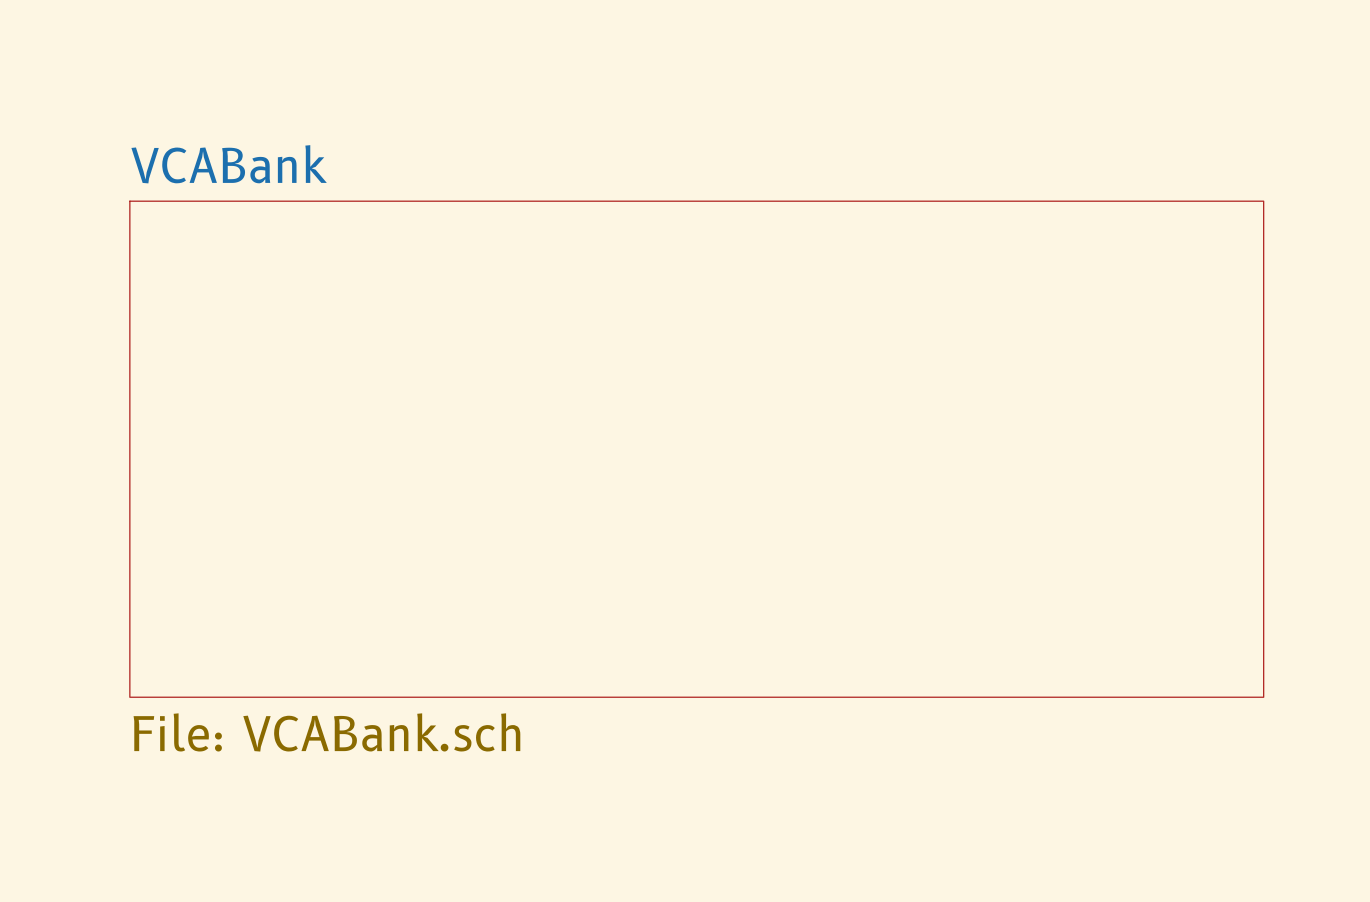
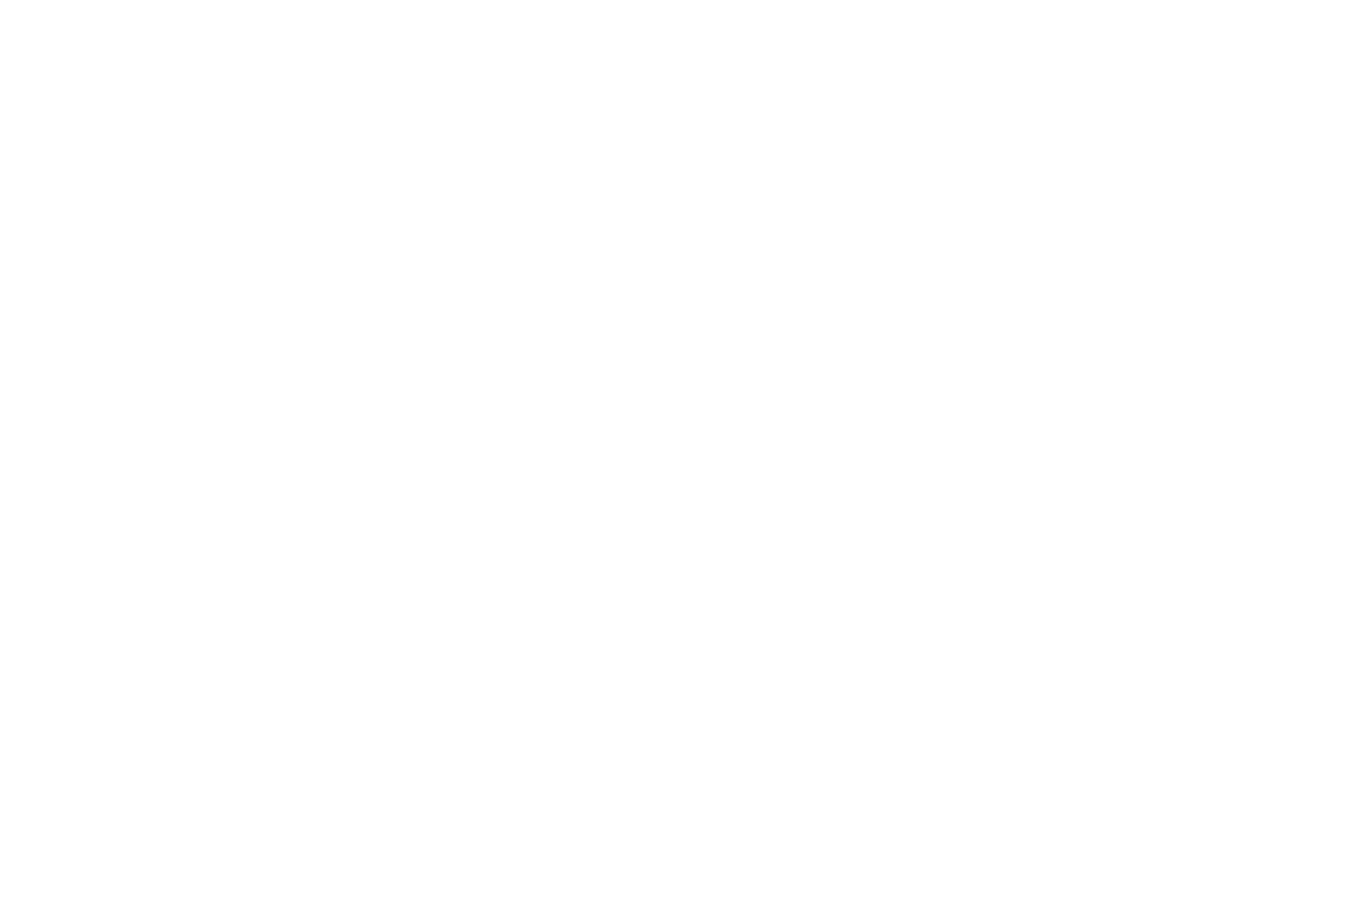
sheet VCABank: File: VCABank.sch (696, 449) -> none

